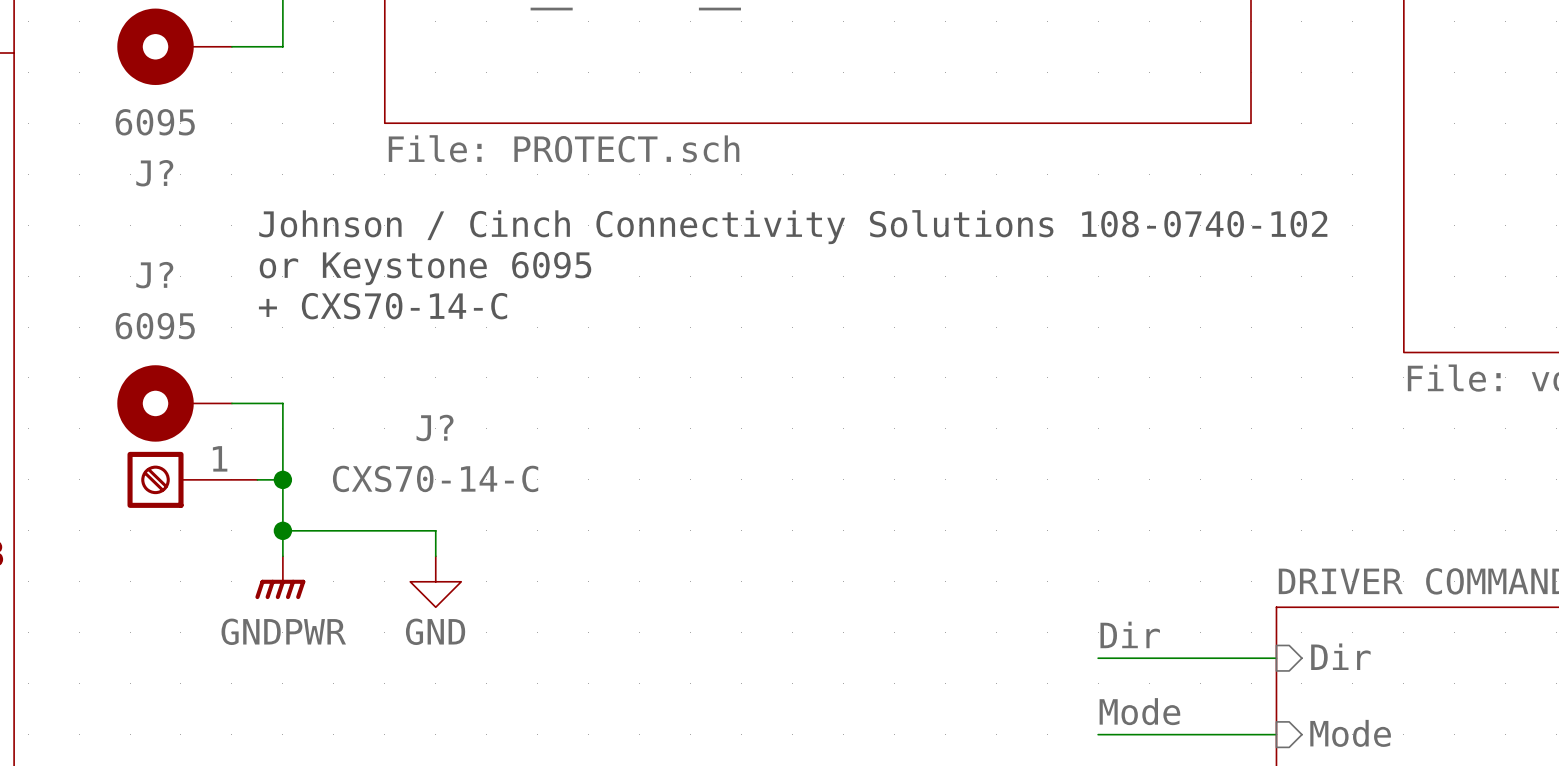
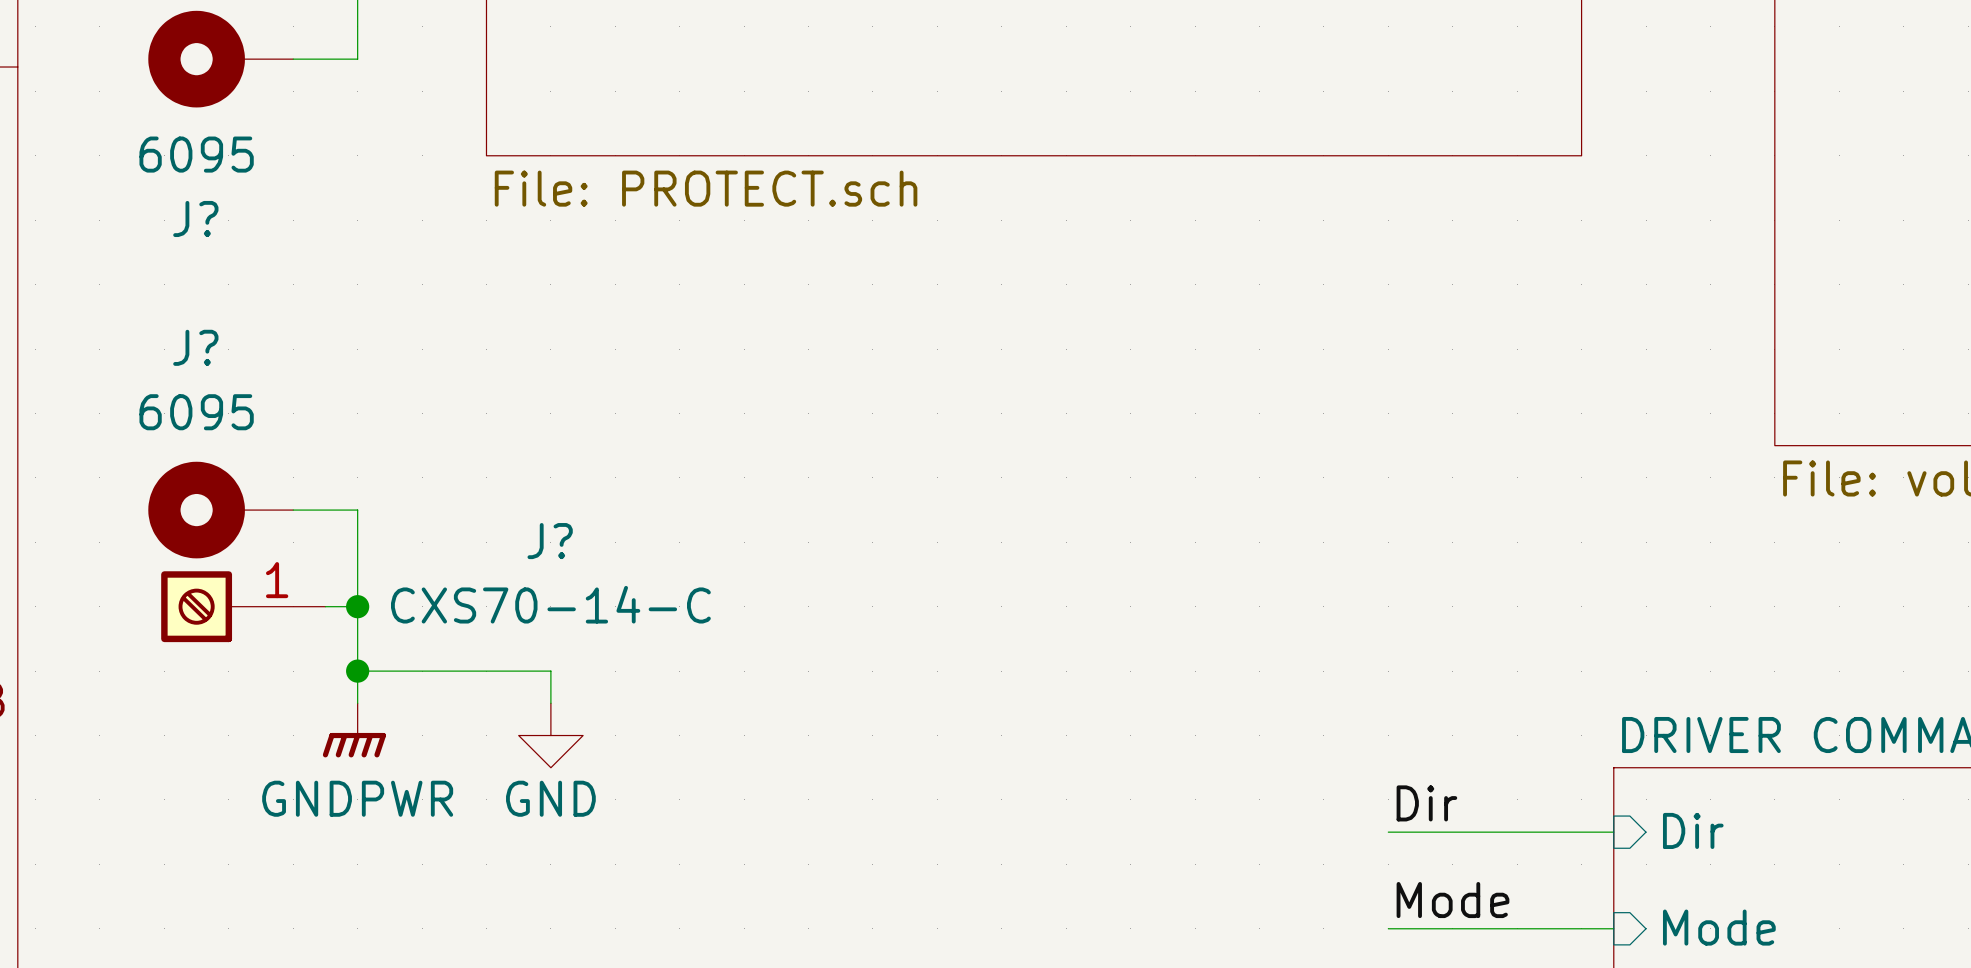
text: Johnson / Cinch Connectivity Solutions 108-0740-102 (793, 227) -> none
text: or Keystone 6095 (425, 268) -> none
text: + CXS70-14-C (383, 306) -> none

